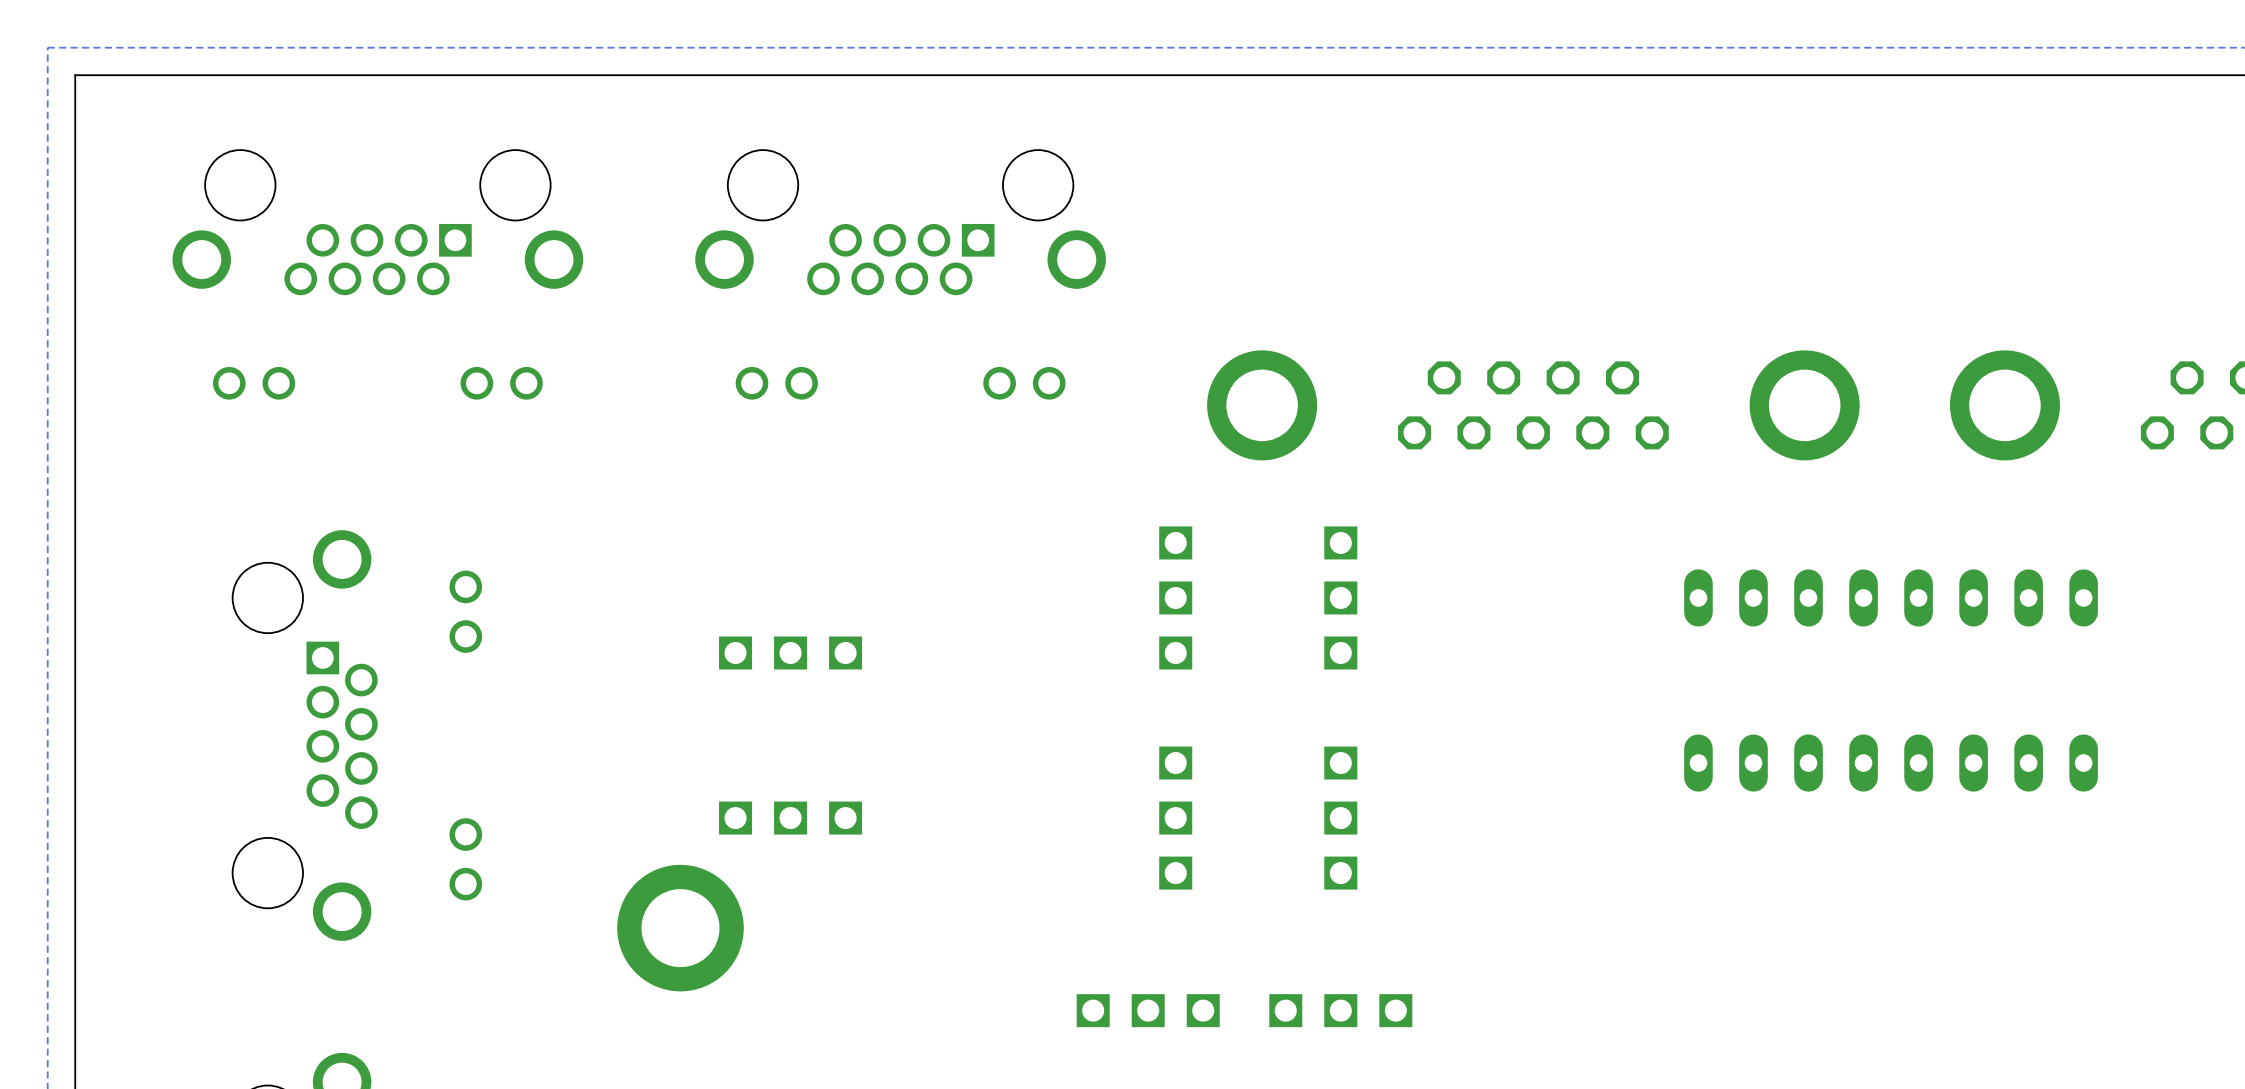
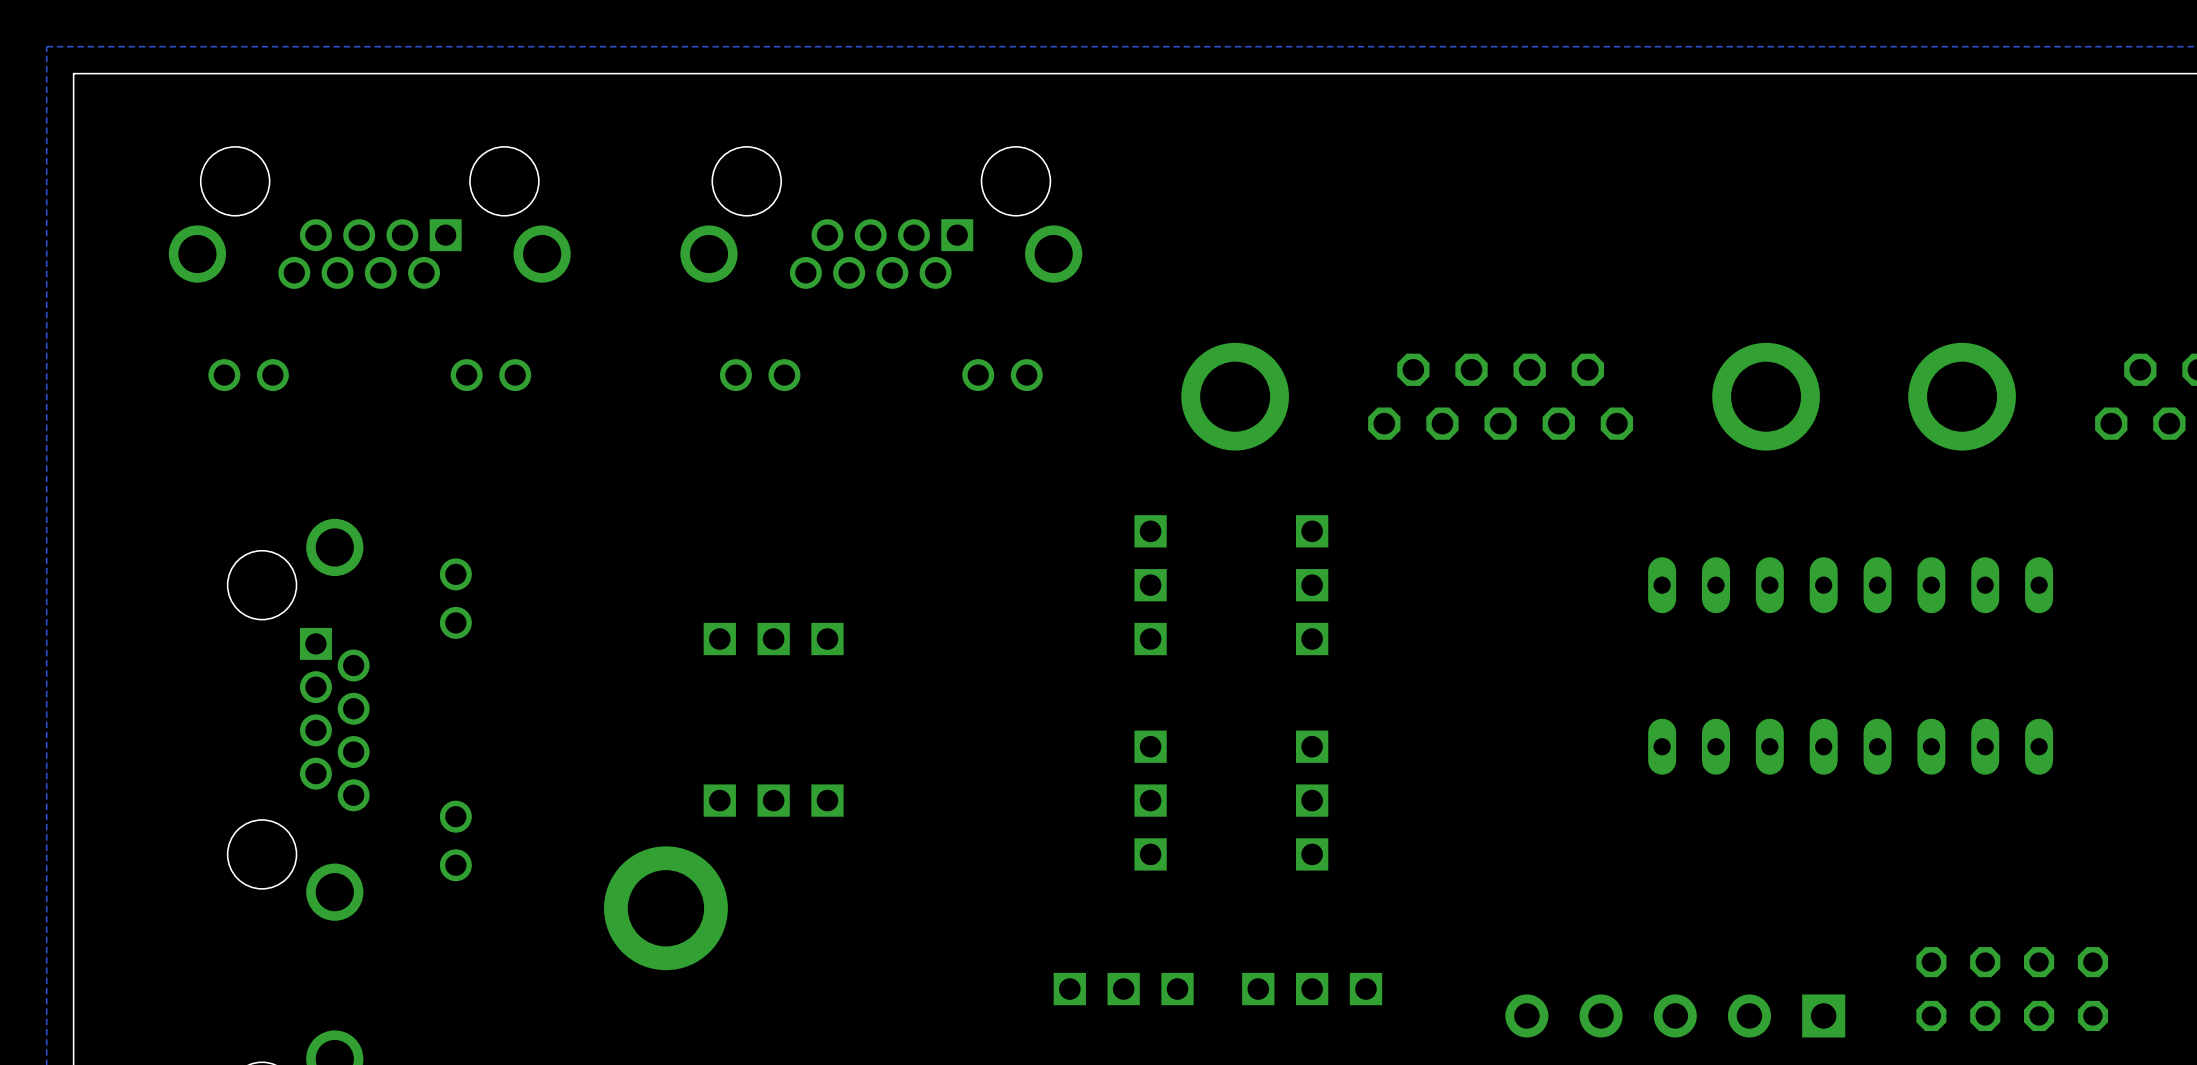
part: none -> (2012, 989)
part: none -> (1675, 1015)

